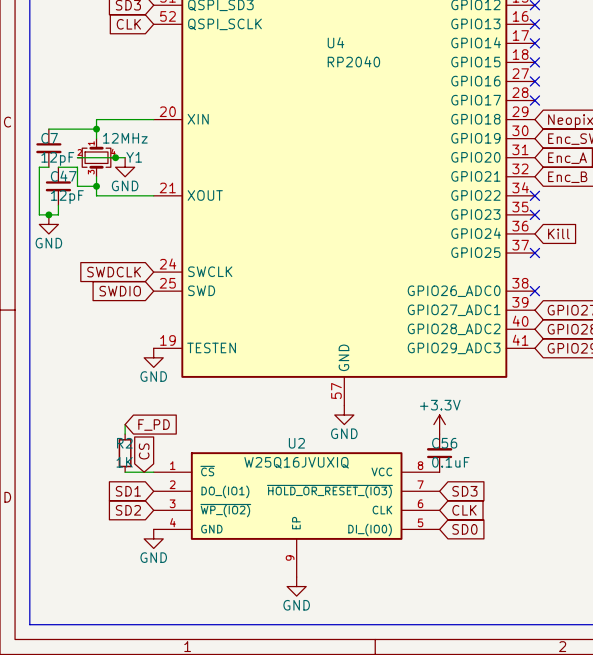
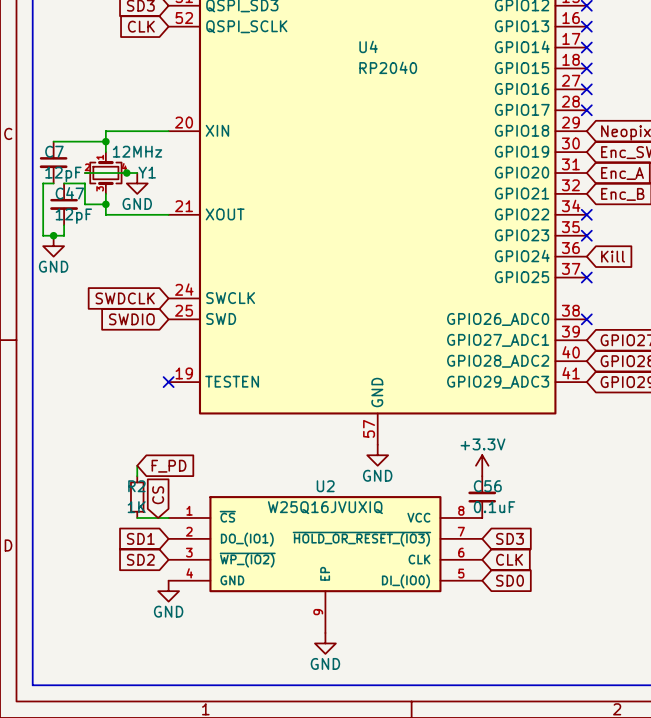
no-connect mark: none -> (168, 382)
power symbol: GND (153, 357) -> none

